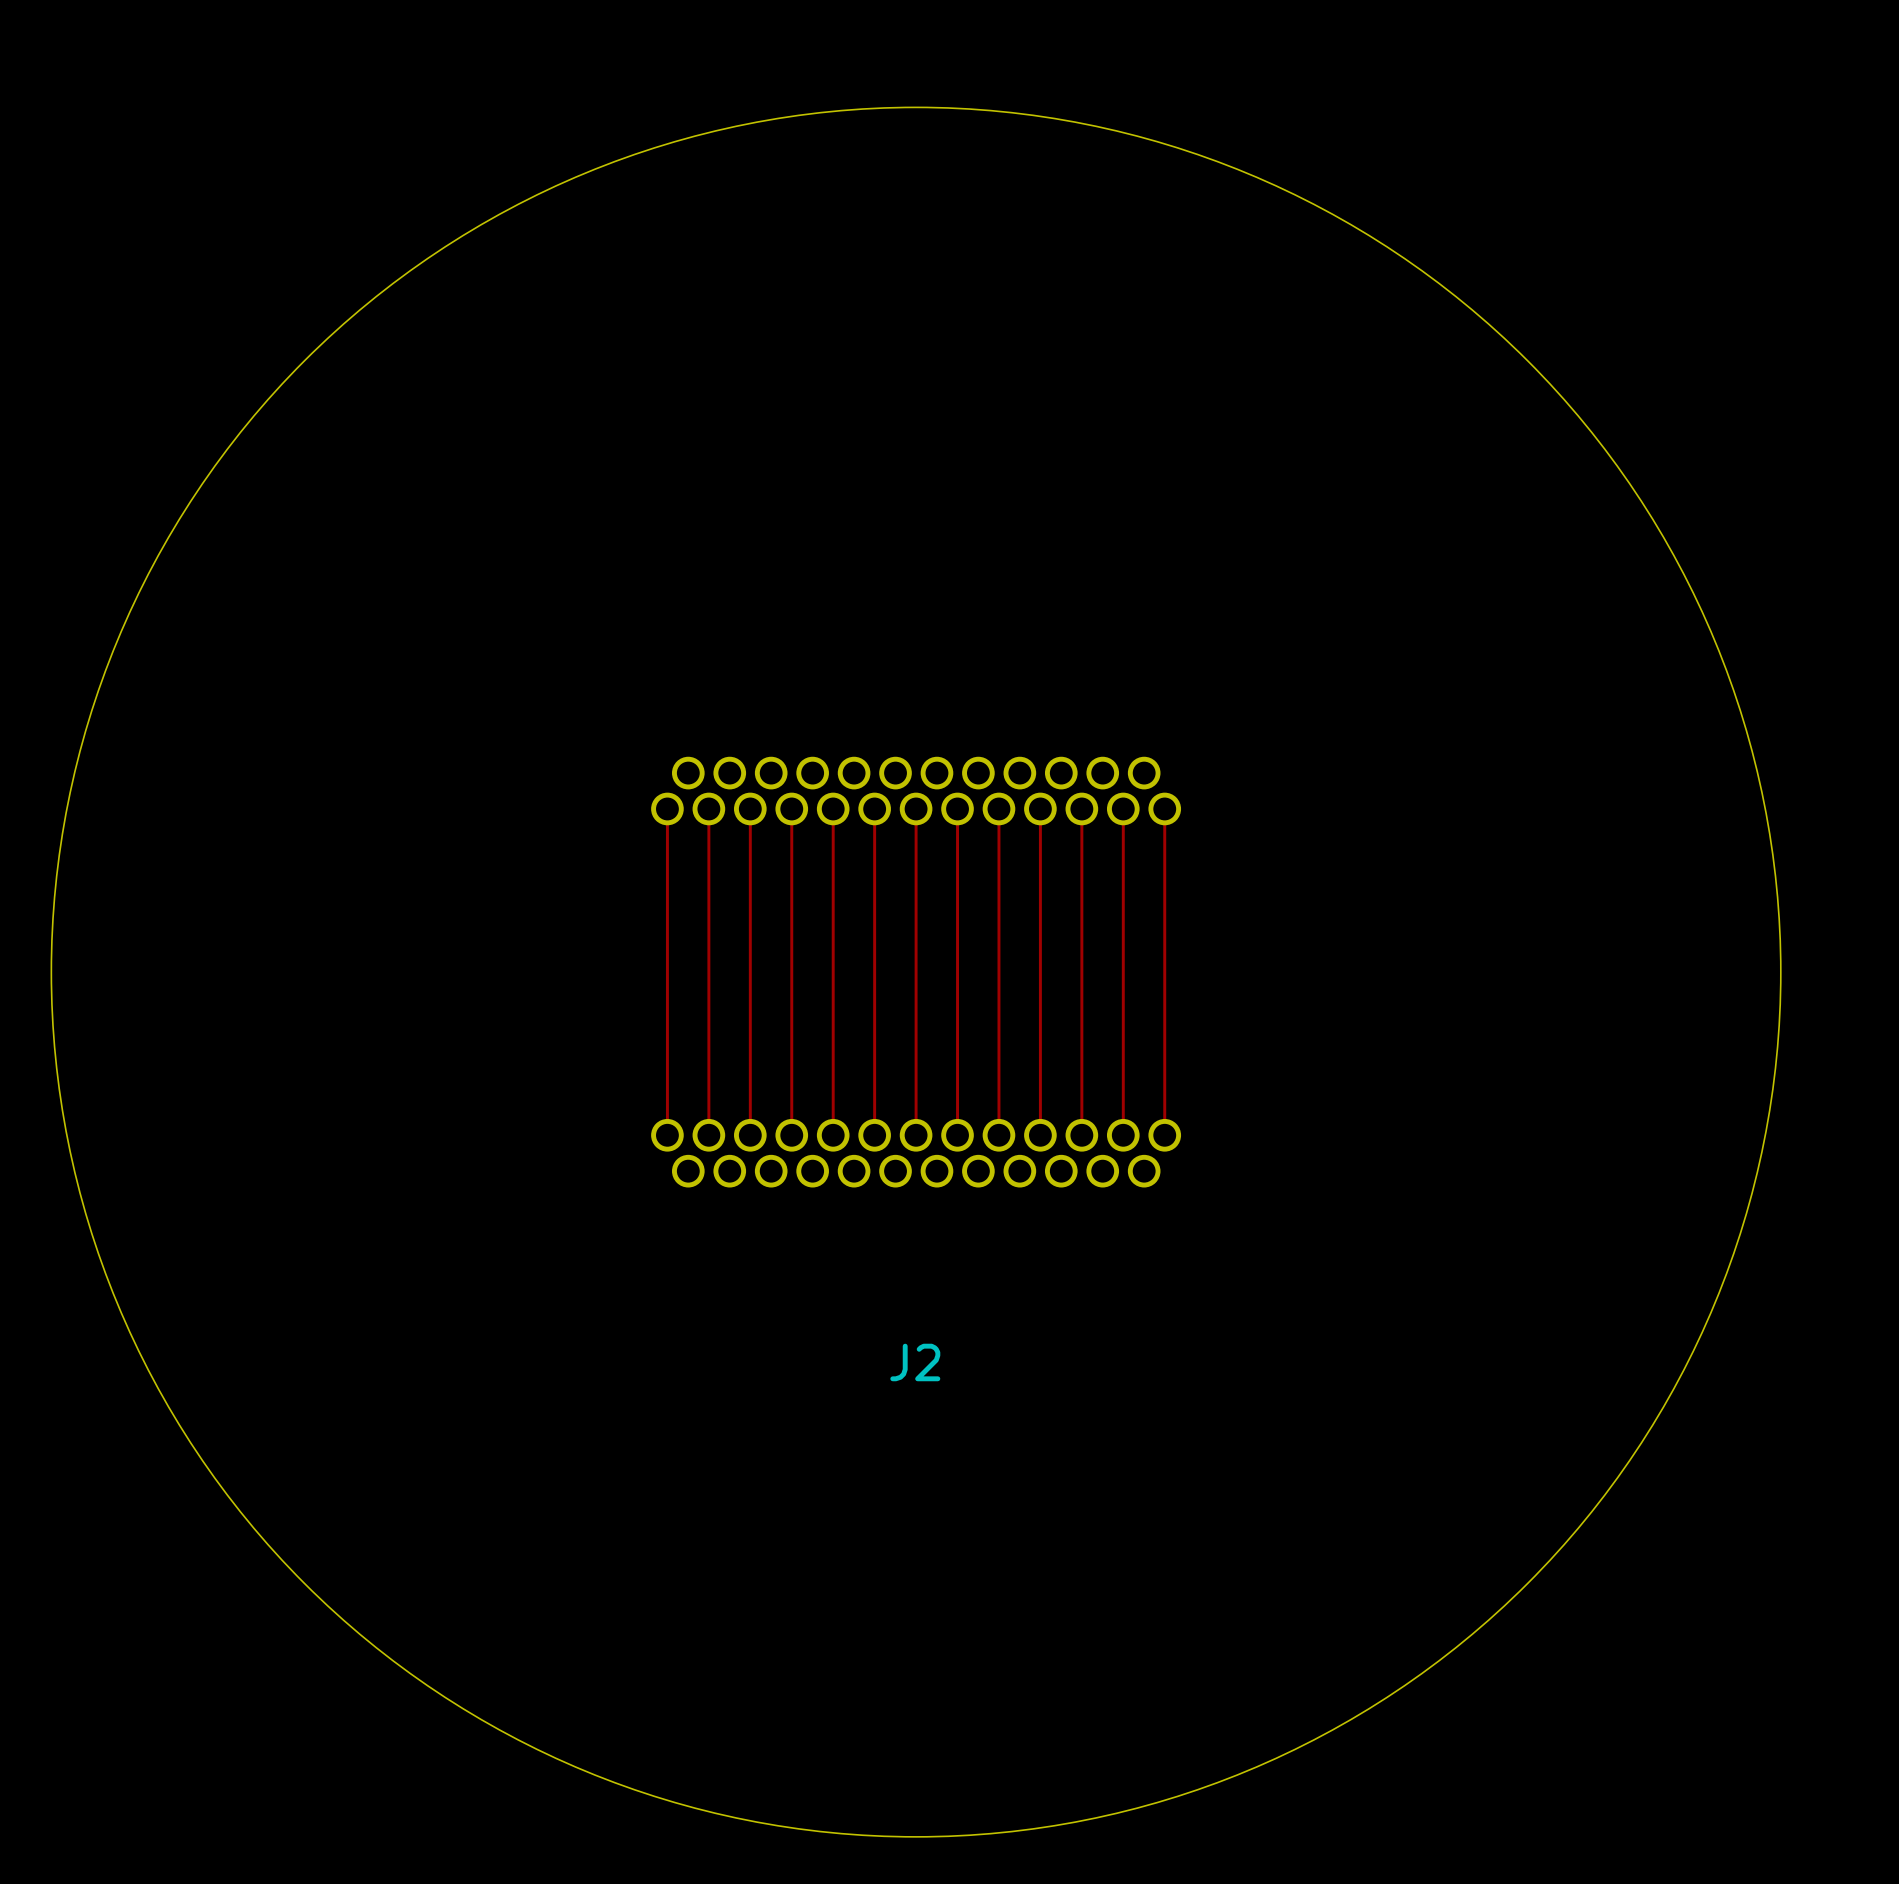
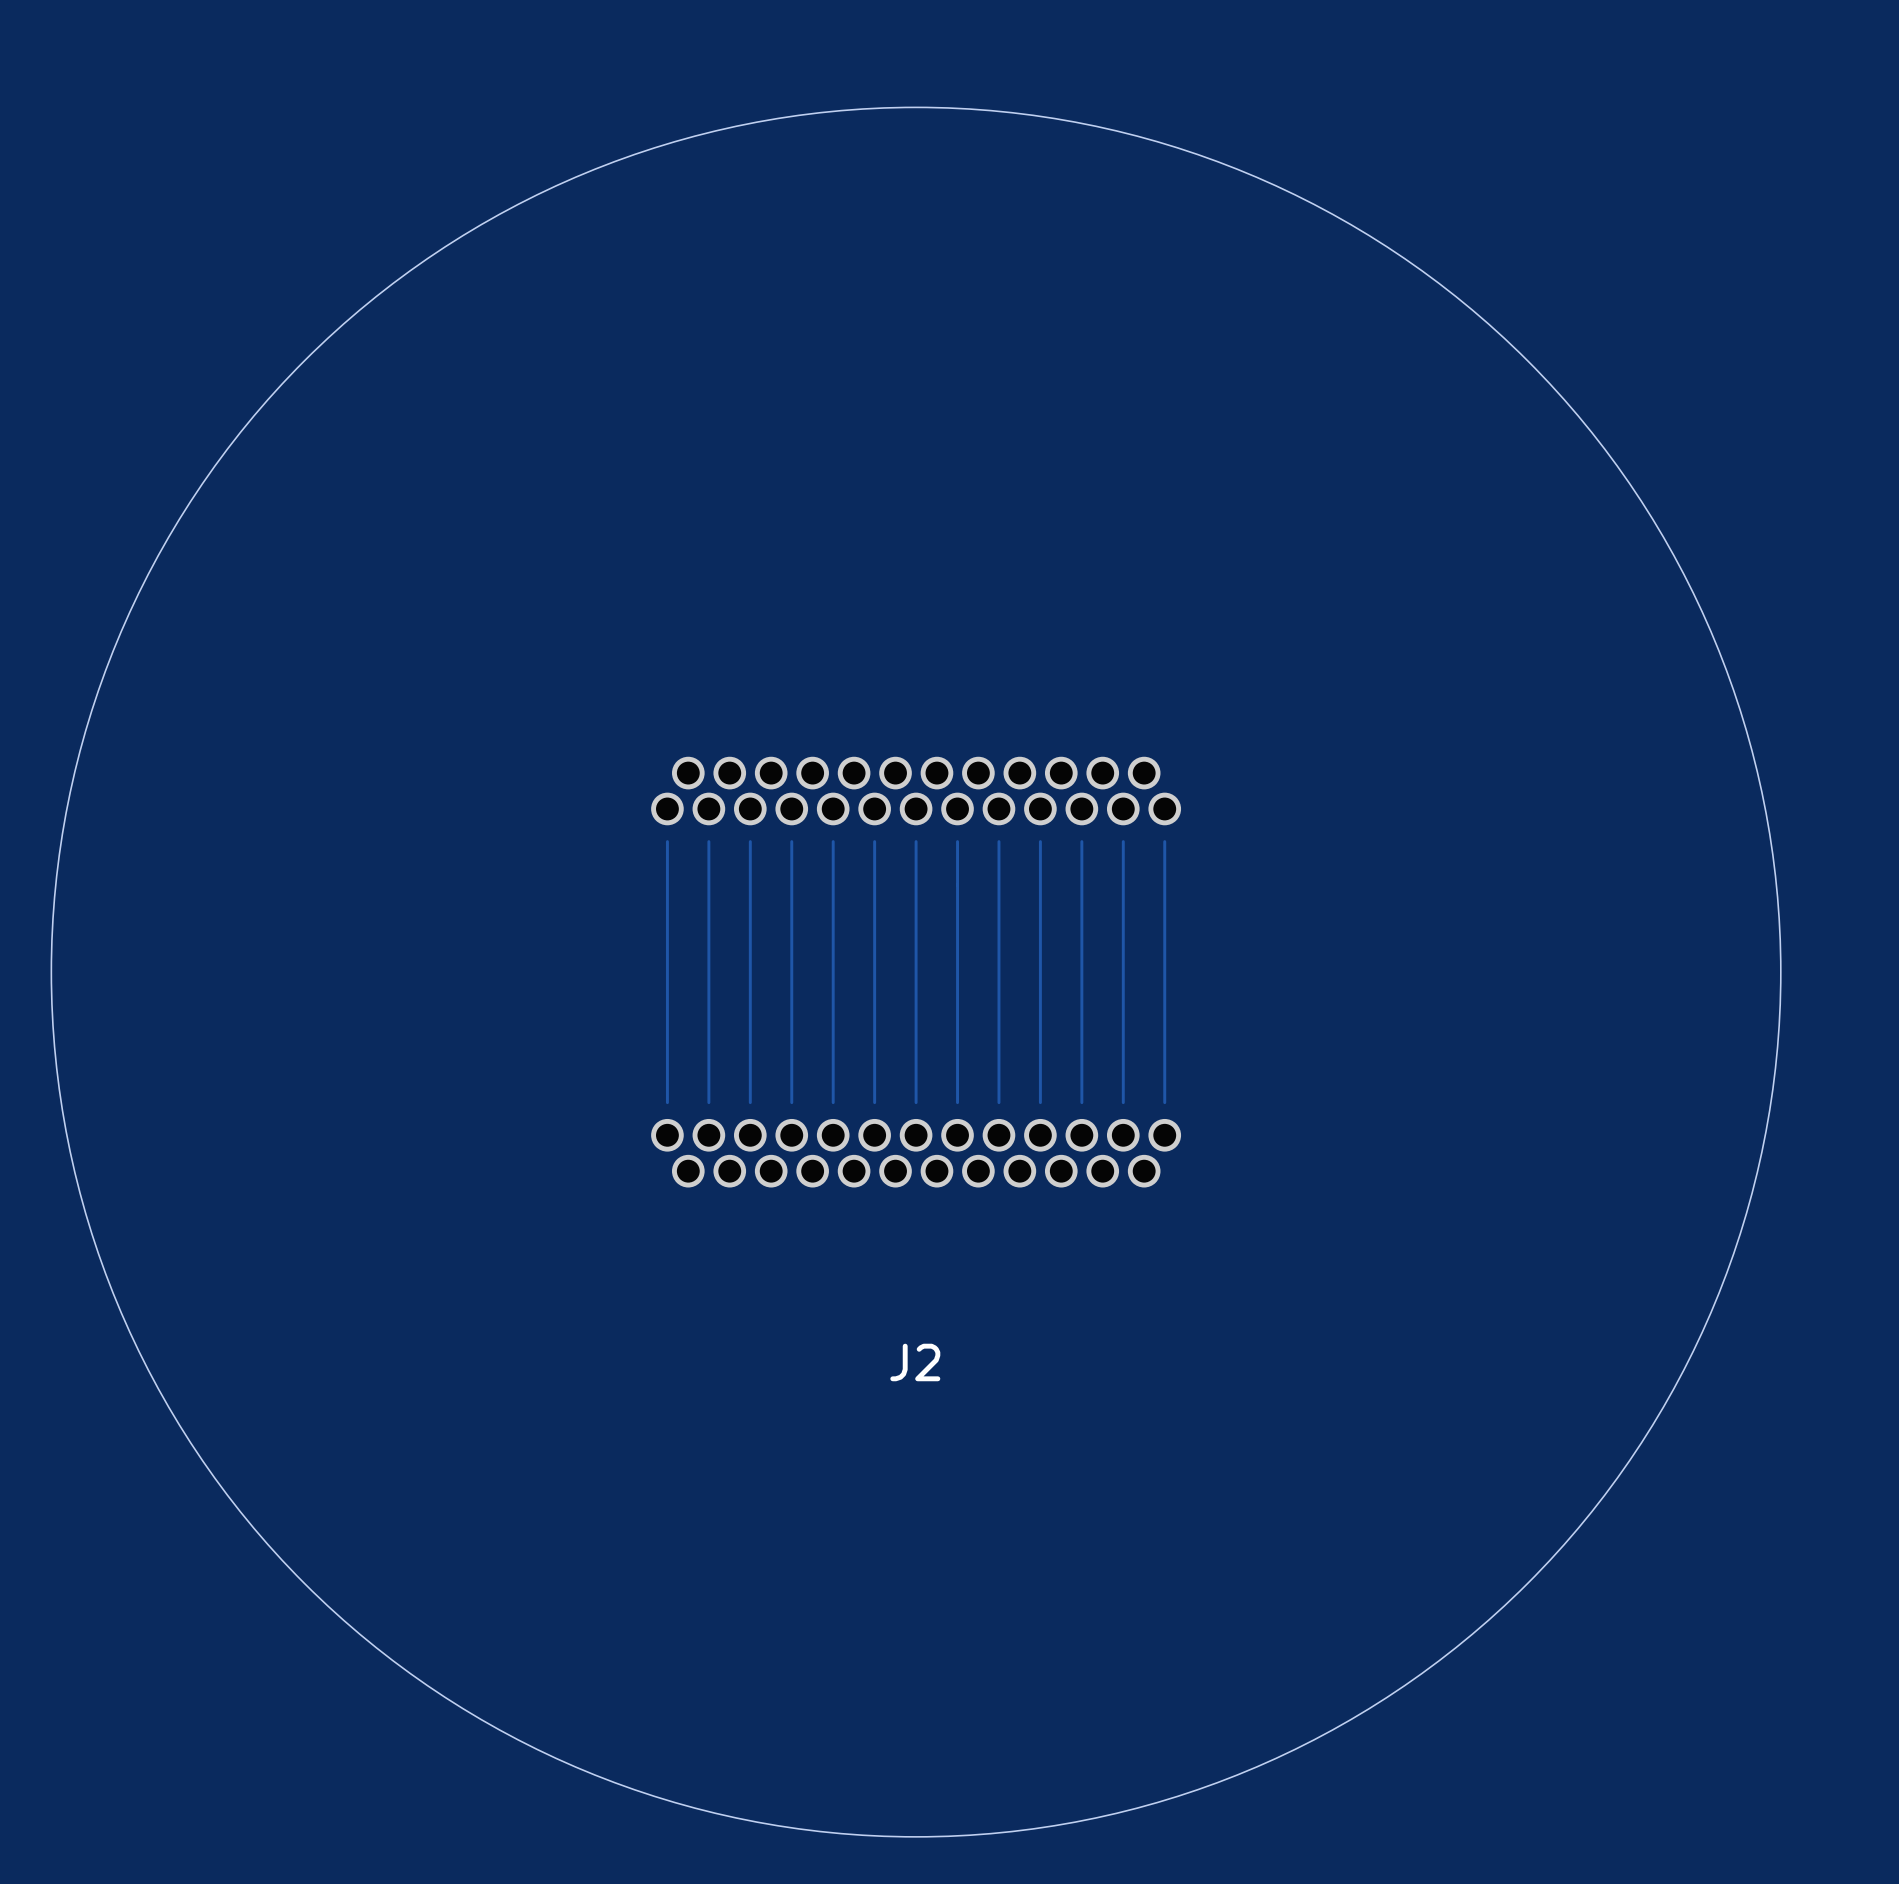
track: (667, 808) (667, 841) -> none
track: (708, 808) (708, 841) -> none
track: (750, 808) (750, 841) -> none
track: (791, 808) (791, 841) -> none
track: (833, 808) (833, 841) -> none
track: (874, 808) (874, 841) -> none
track: (916, 808) (916, 841) -> none
track: (957, 808) (957, 841) -> none
track: (998, 808) (998, 841) -> none
track: (1040, 808) (1040, 841) -> none
track: (1081, 808) (1081, 841) -> none
track: (1123, 808) (1123, 841) -> none
track: (1164, 808) (1164, 841) -> none
track: (667, 1102) (667, 1135) -> none
track: (708, 1102) (708, 1135) -> none
track: (750, 1102) (750, 1135) -> none
track: (791, 1102) (791, 1135) -> none
track: (833, 1102) (833, 1135) -> none
track: (874, 1102) (874, 1135) -> none
track: (916, 1102) (916, 1135) -> none
track: (957, 1102) (957, 1135) -> none
track: (998, 1102) (998, 1135) -> none
track: (1040, 1102) (1040, 1135) -> none
track: (1081, 1102) (1081, 1135) -> none
track: (1123, 1102) (1123, 1135) -> none
track: (1164, 1102) (1164, 1135) -> none

